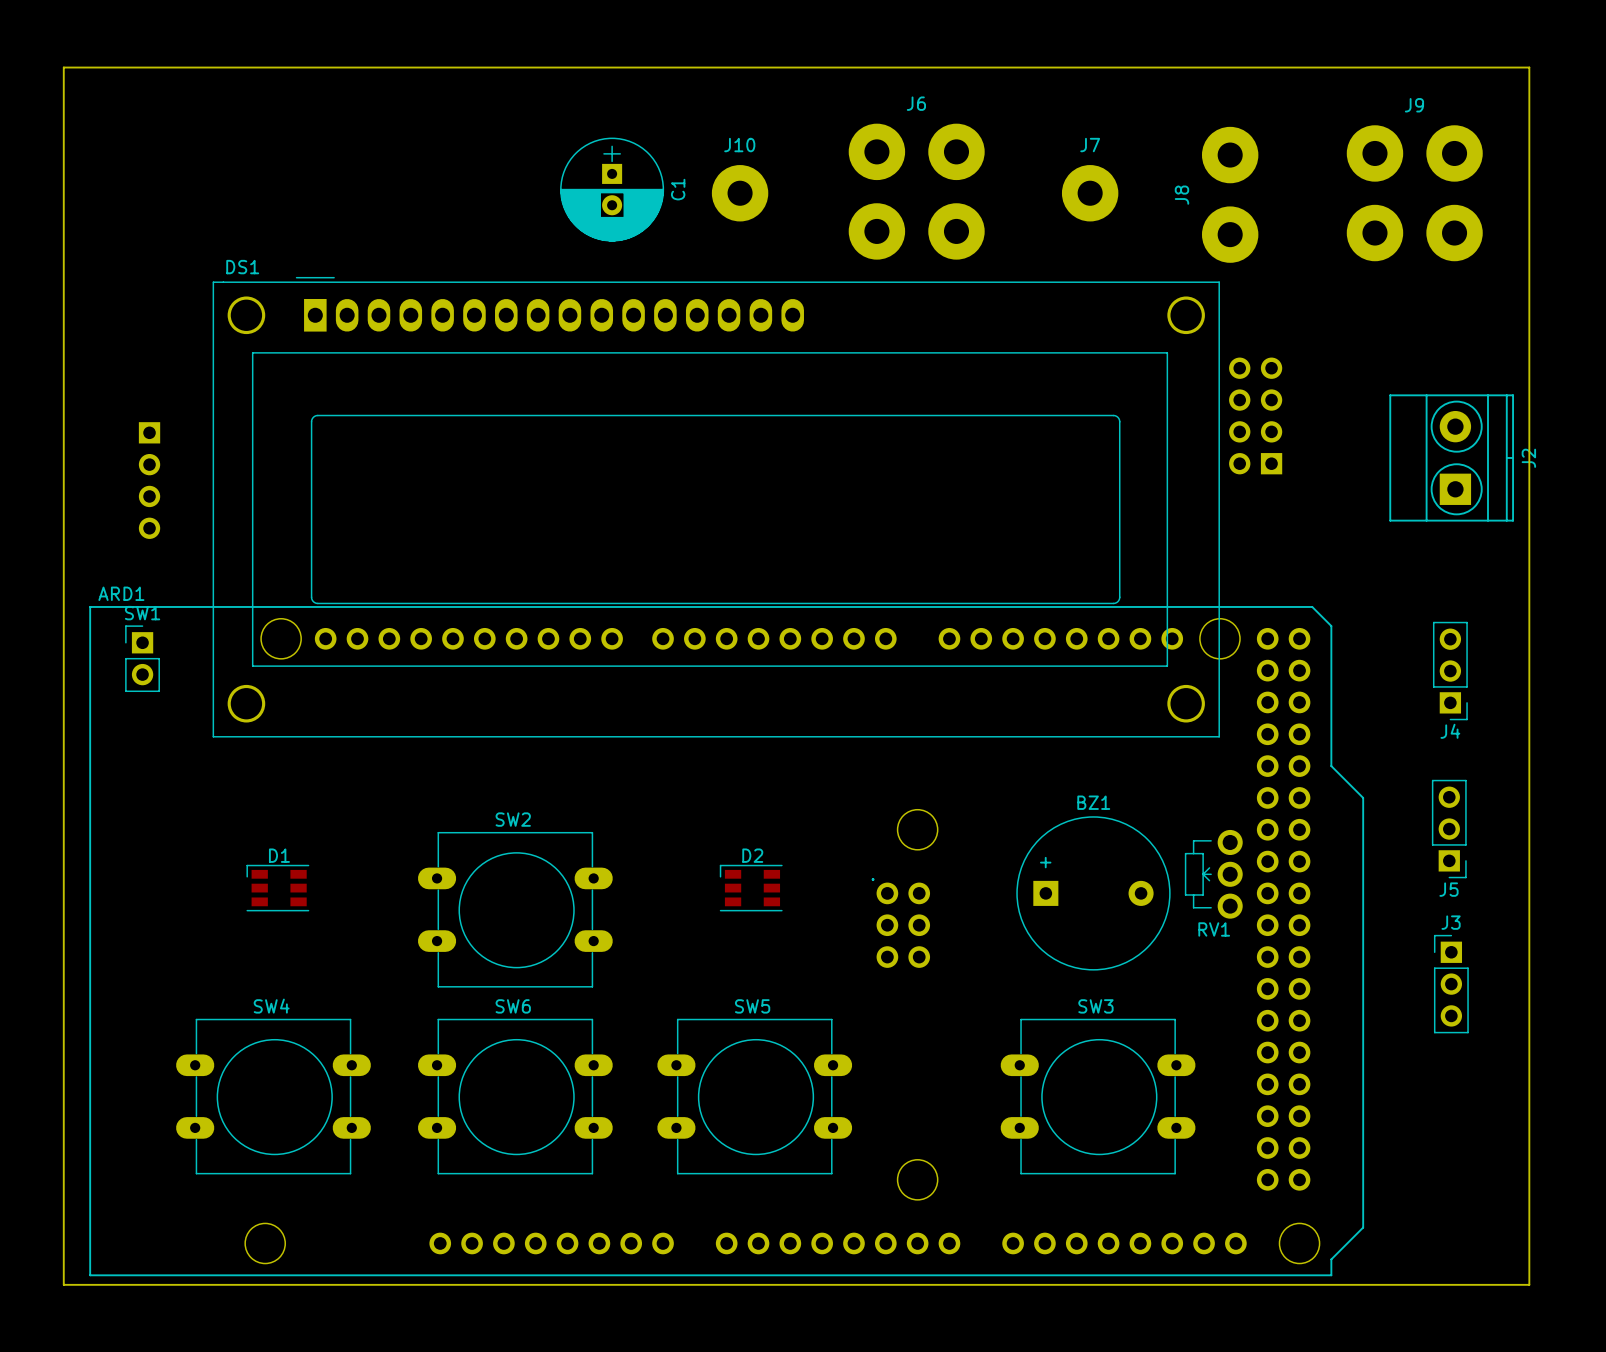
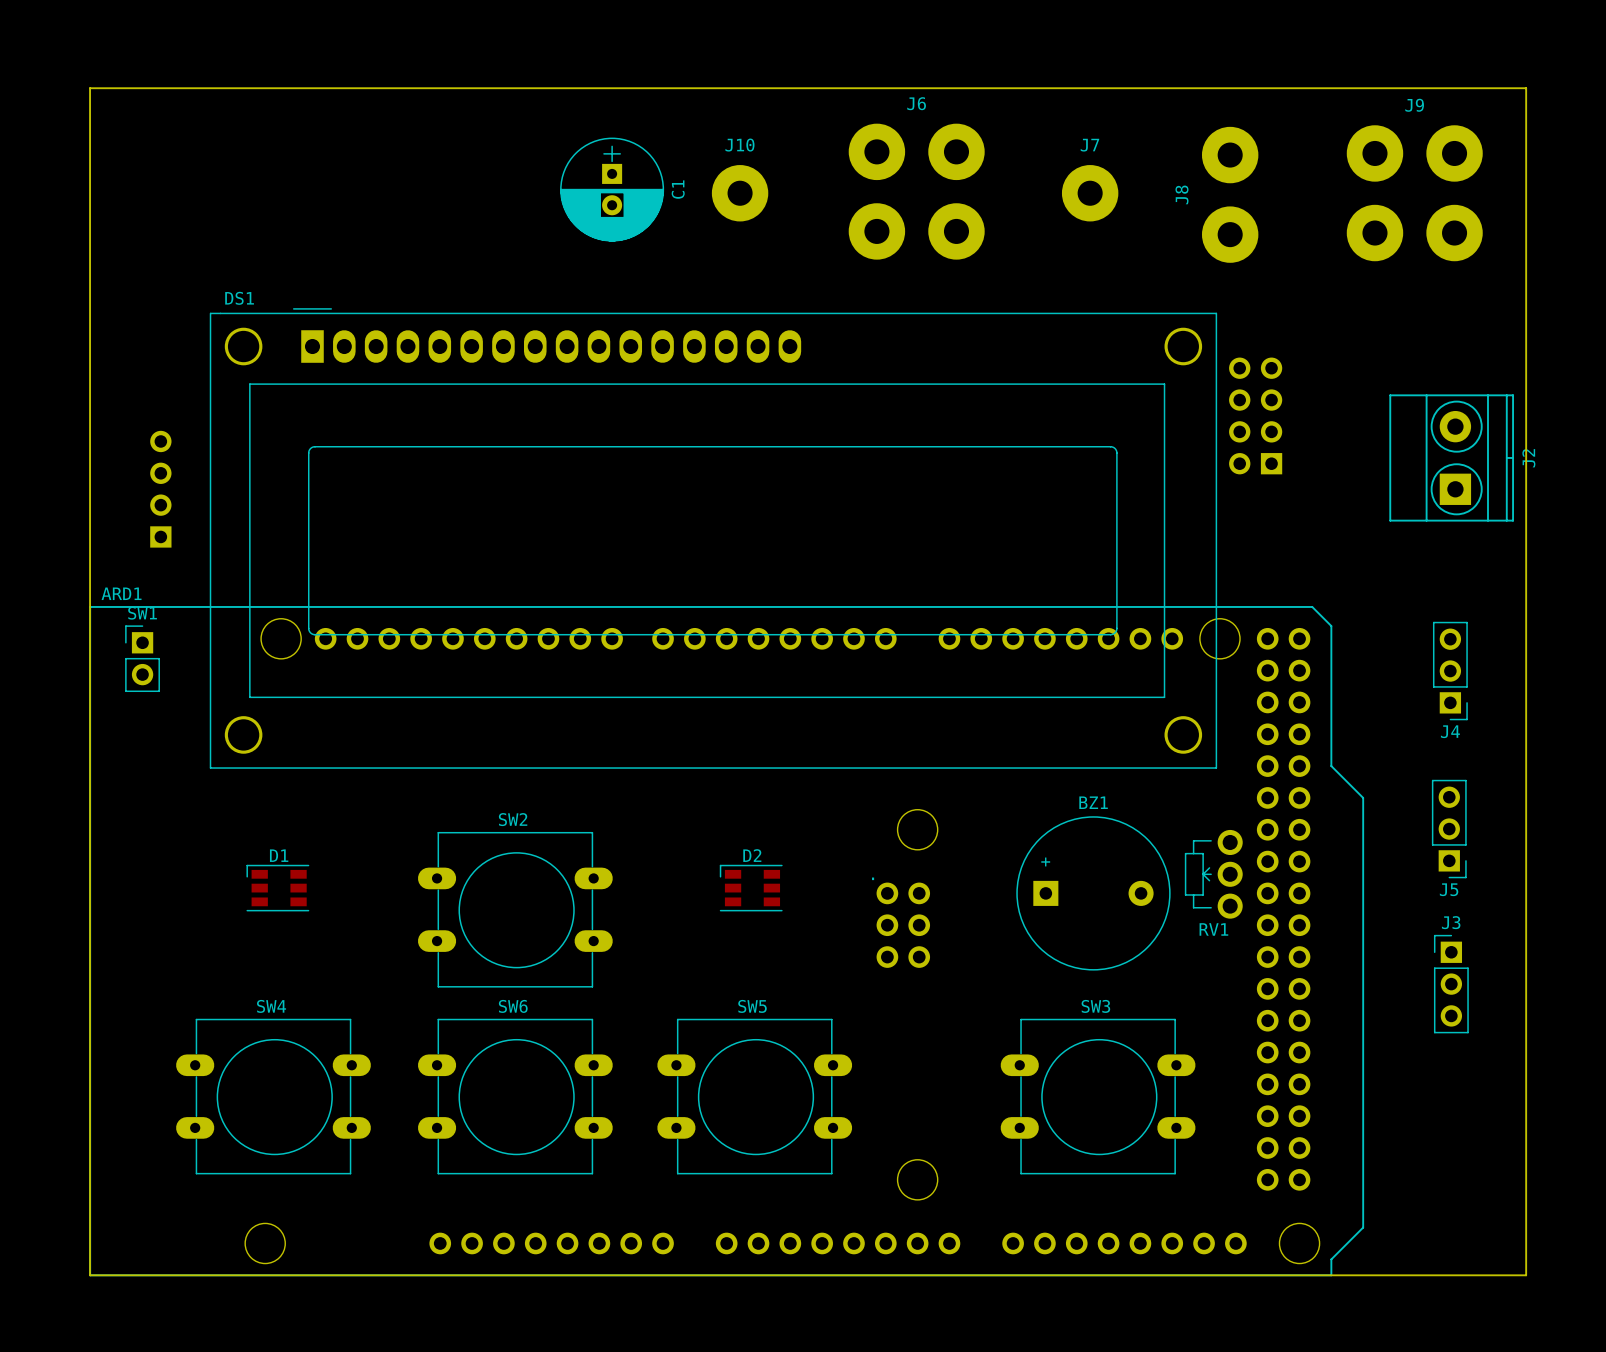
board edge: (63, 67) (1529, 67) (1529, 1284) (63, 1284) (63, 67) -> (90, 88) (90, 1275) (1526, 1275) (1526, 88) (90, 88)
DS1 footprint: [212, 276, 1220, 738] -> [209, 308, 1218, 769]
part rotation: 0° (149, 480) -> 180° (160, 489)

